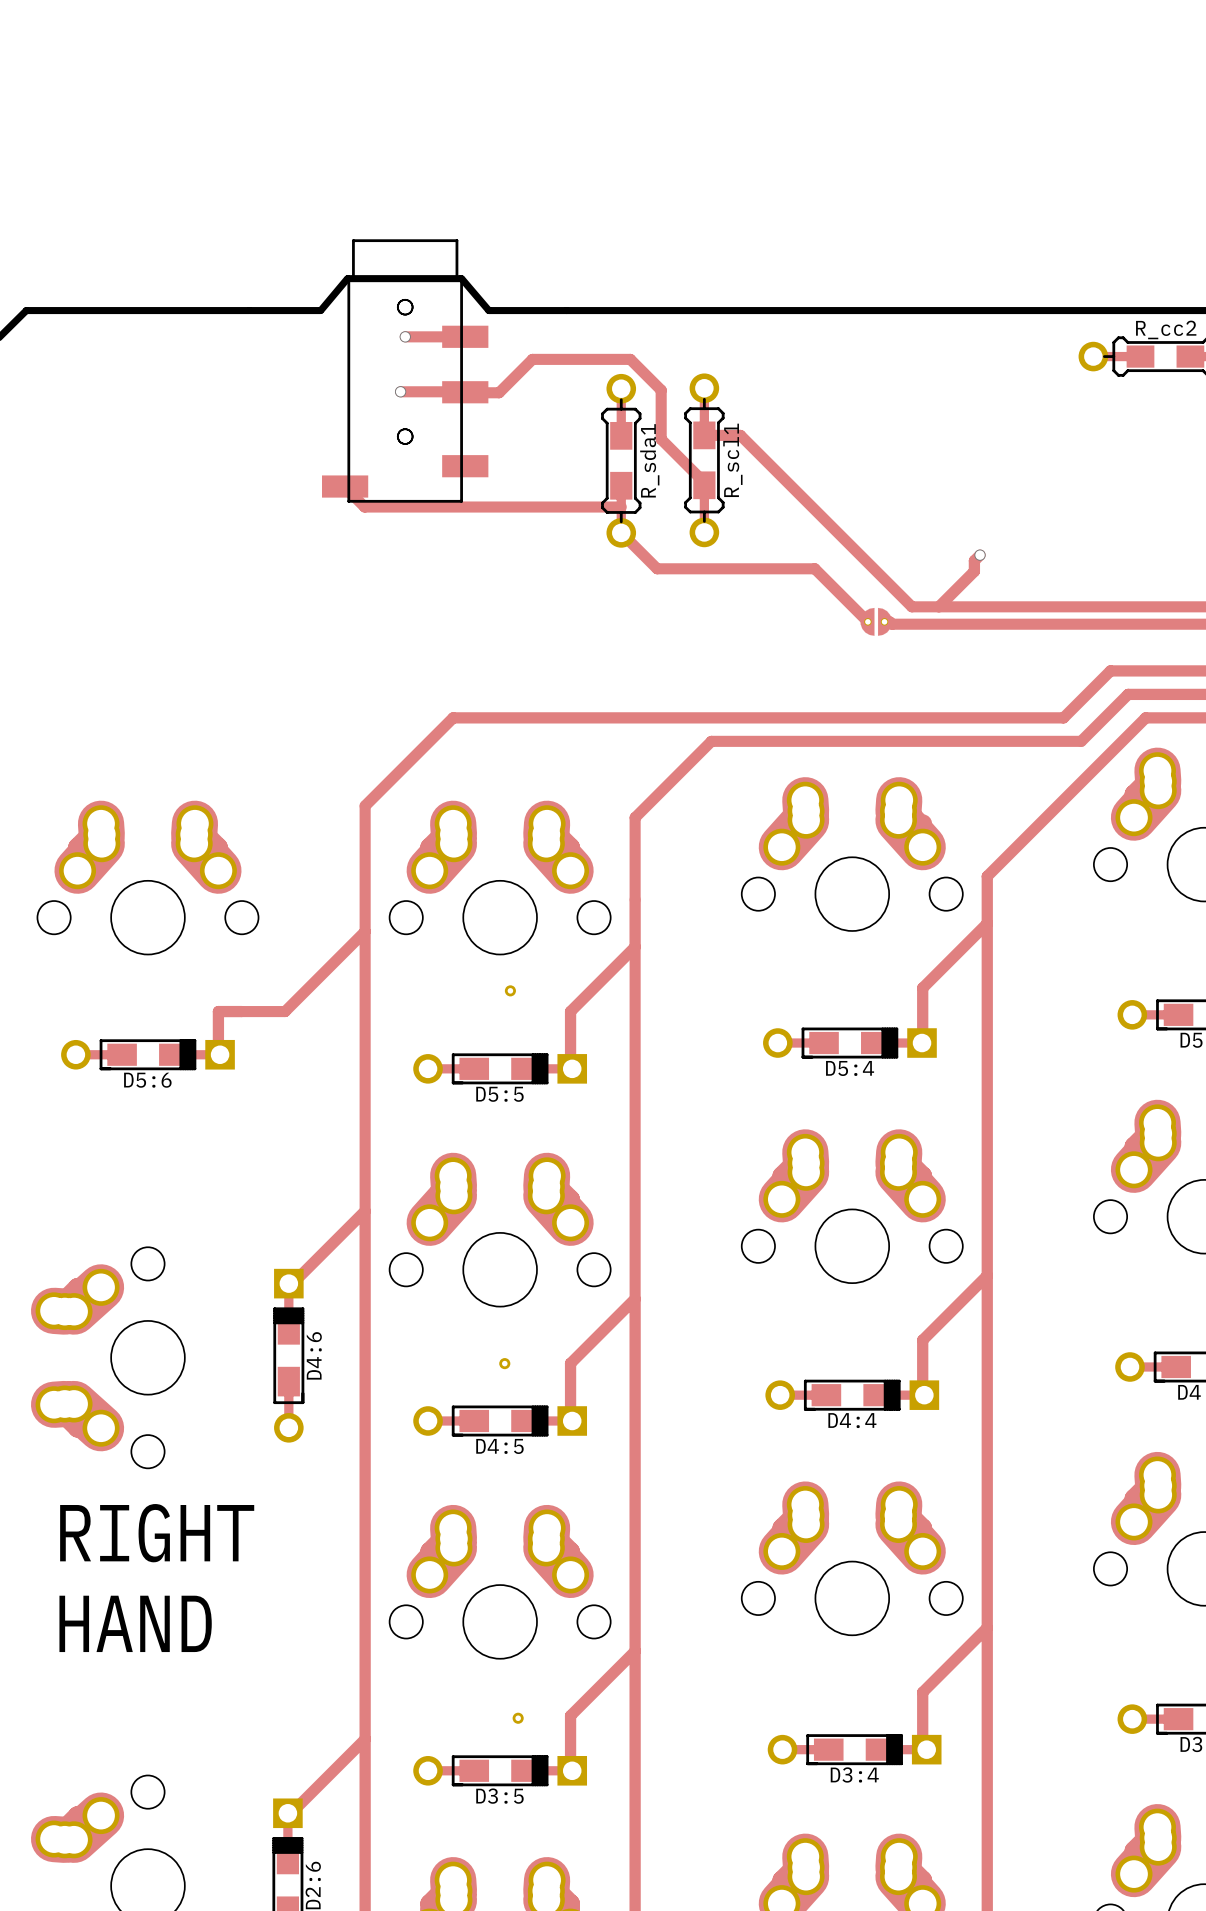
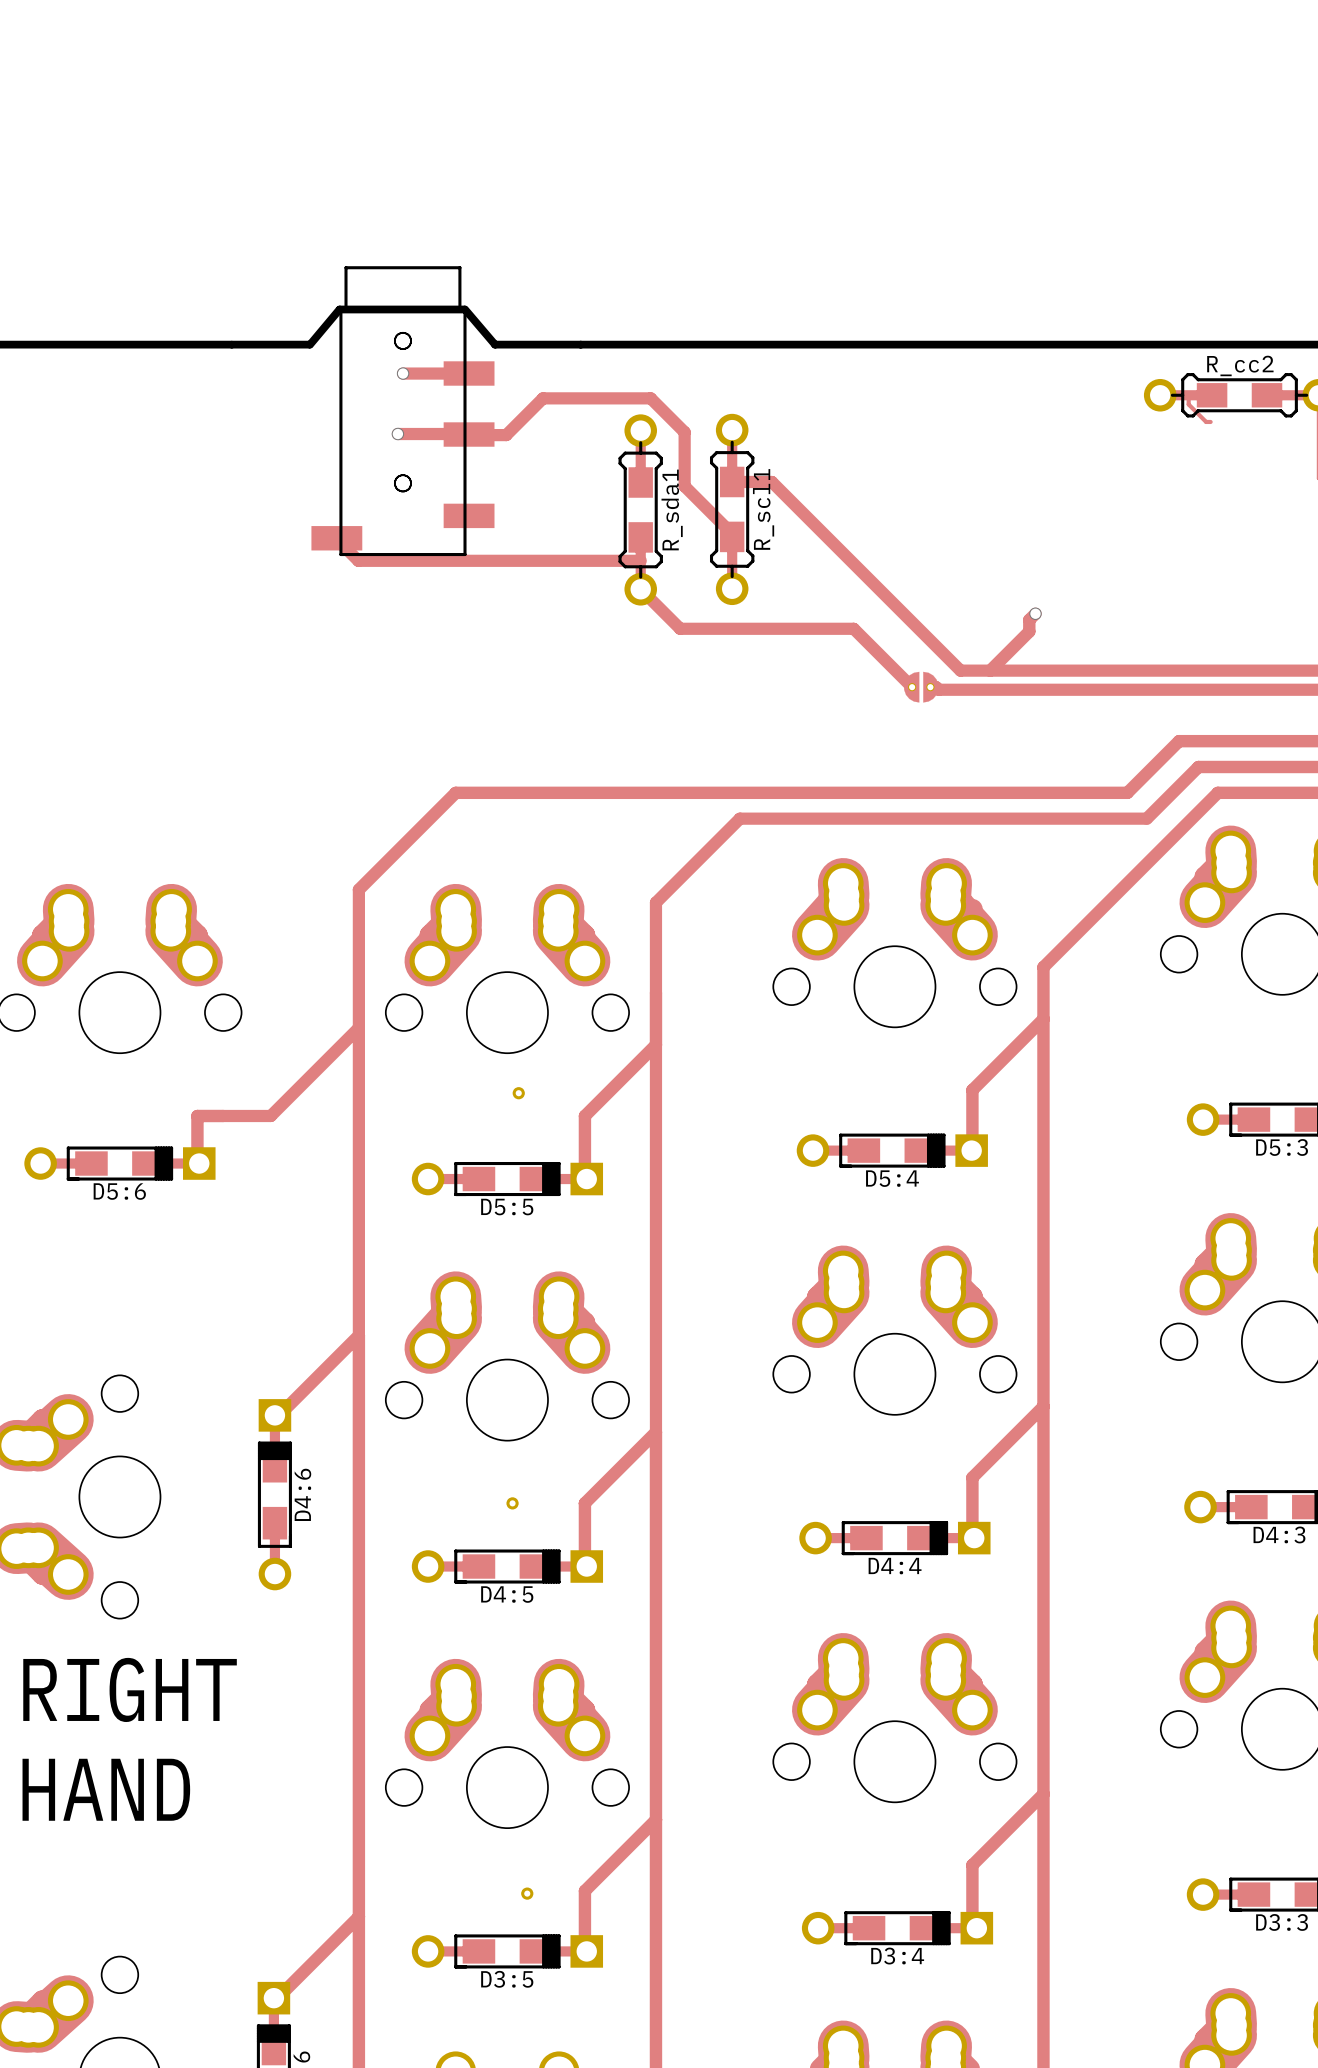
track: none -> (1188, 395) (1188, 404) (1206, 421) (1210, 421)

